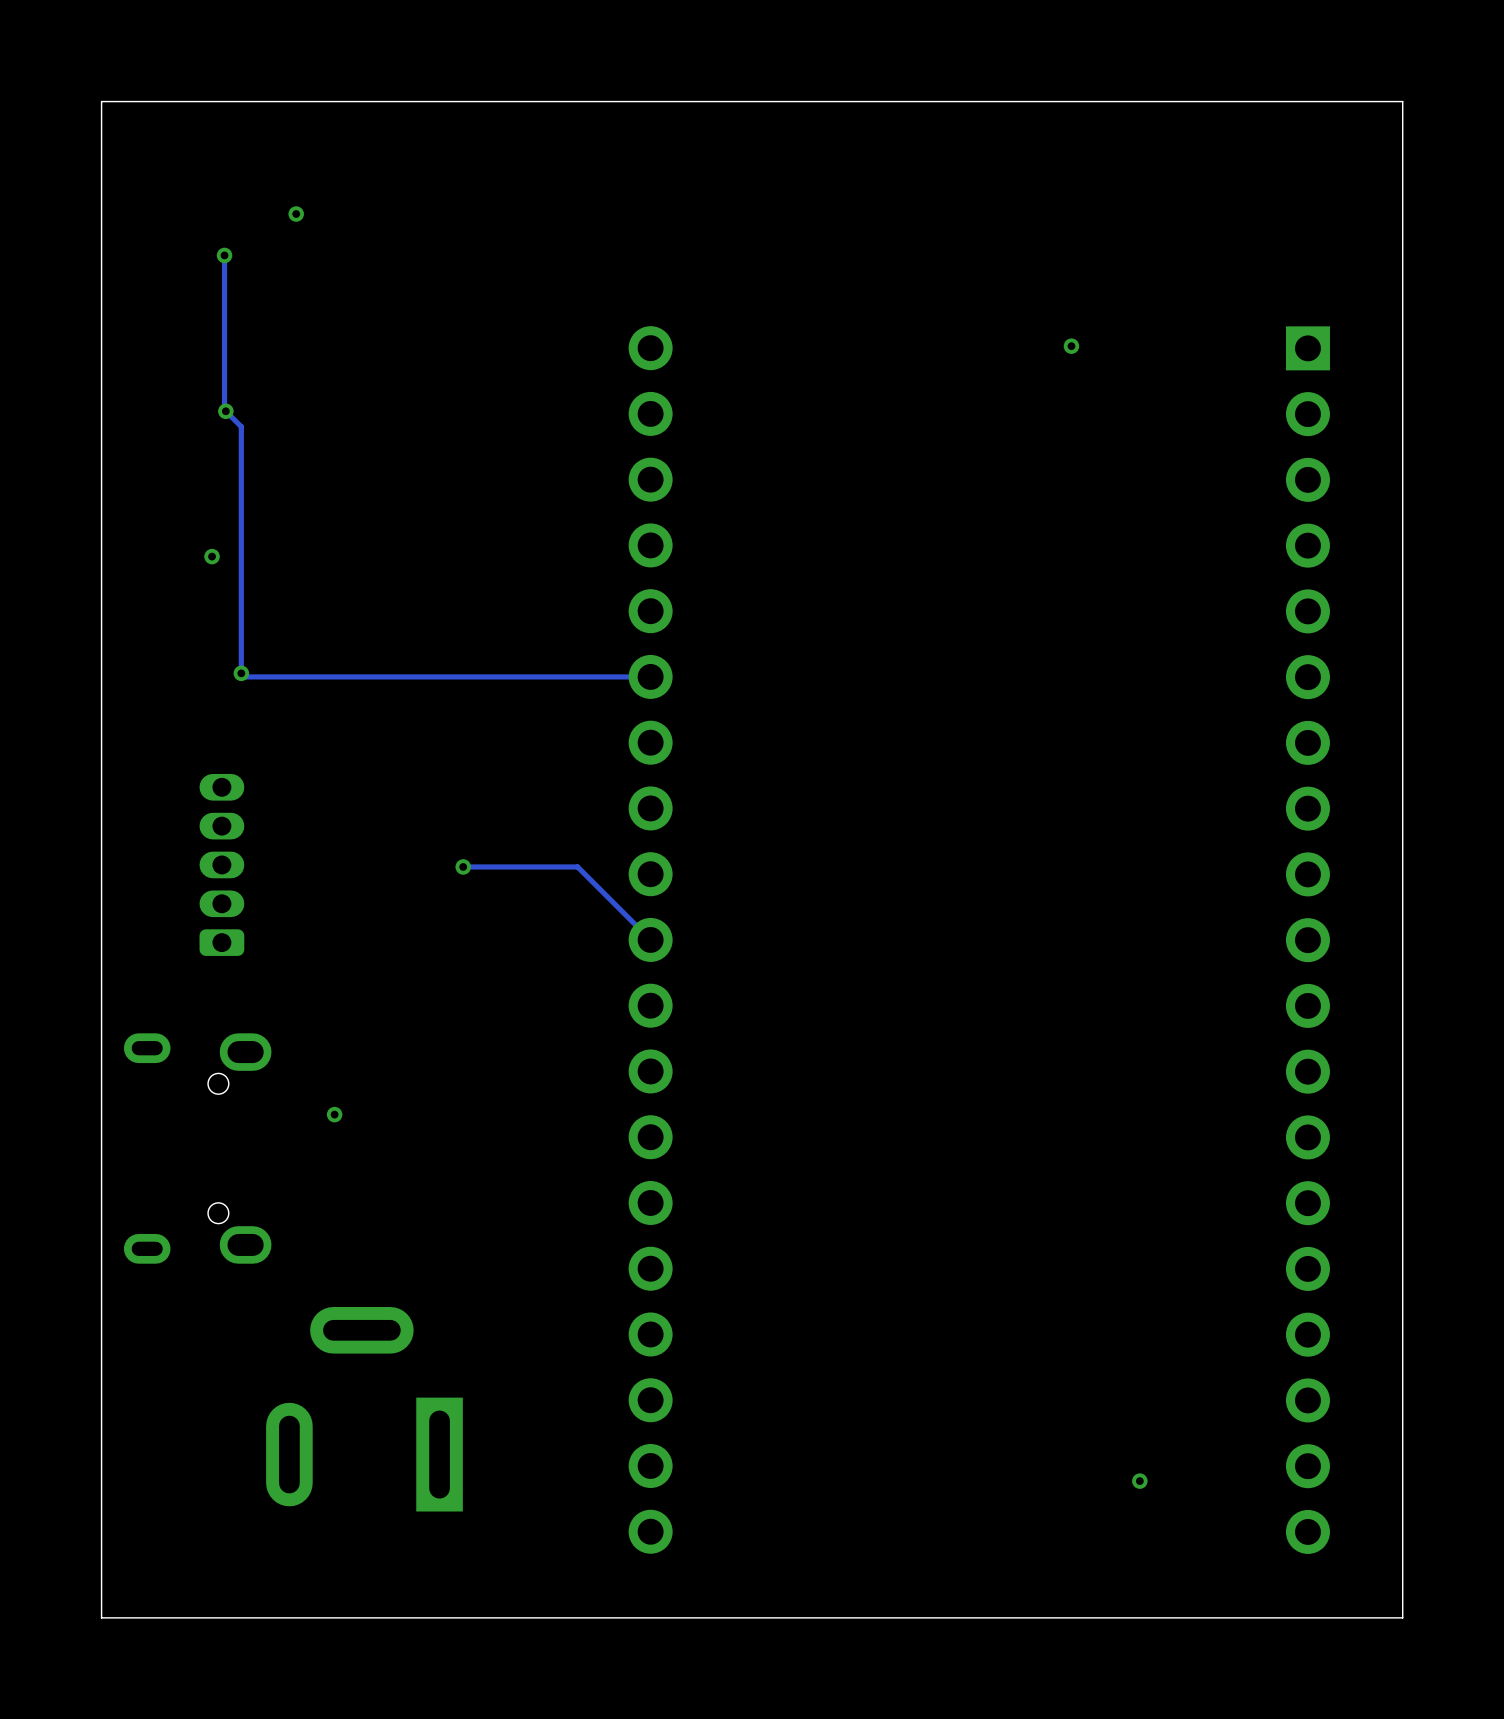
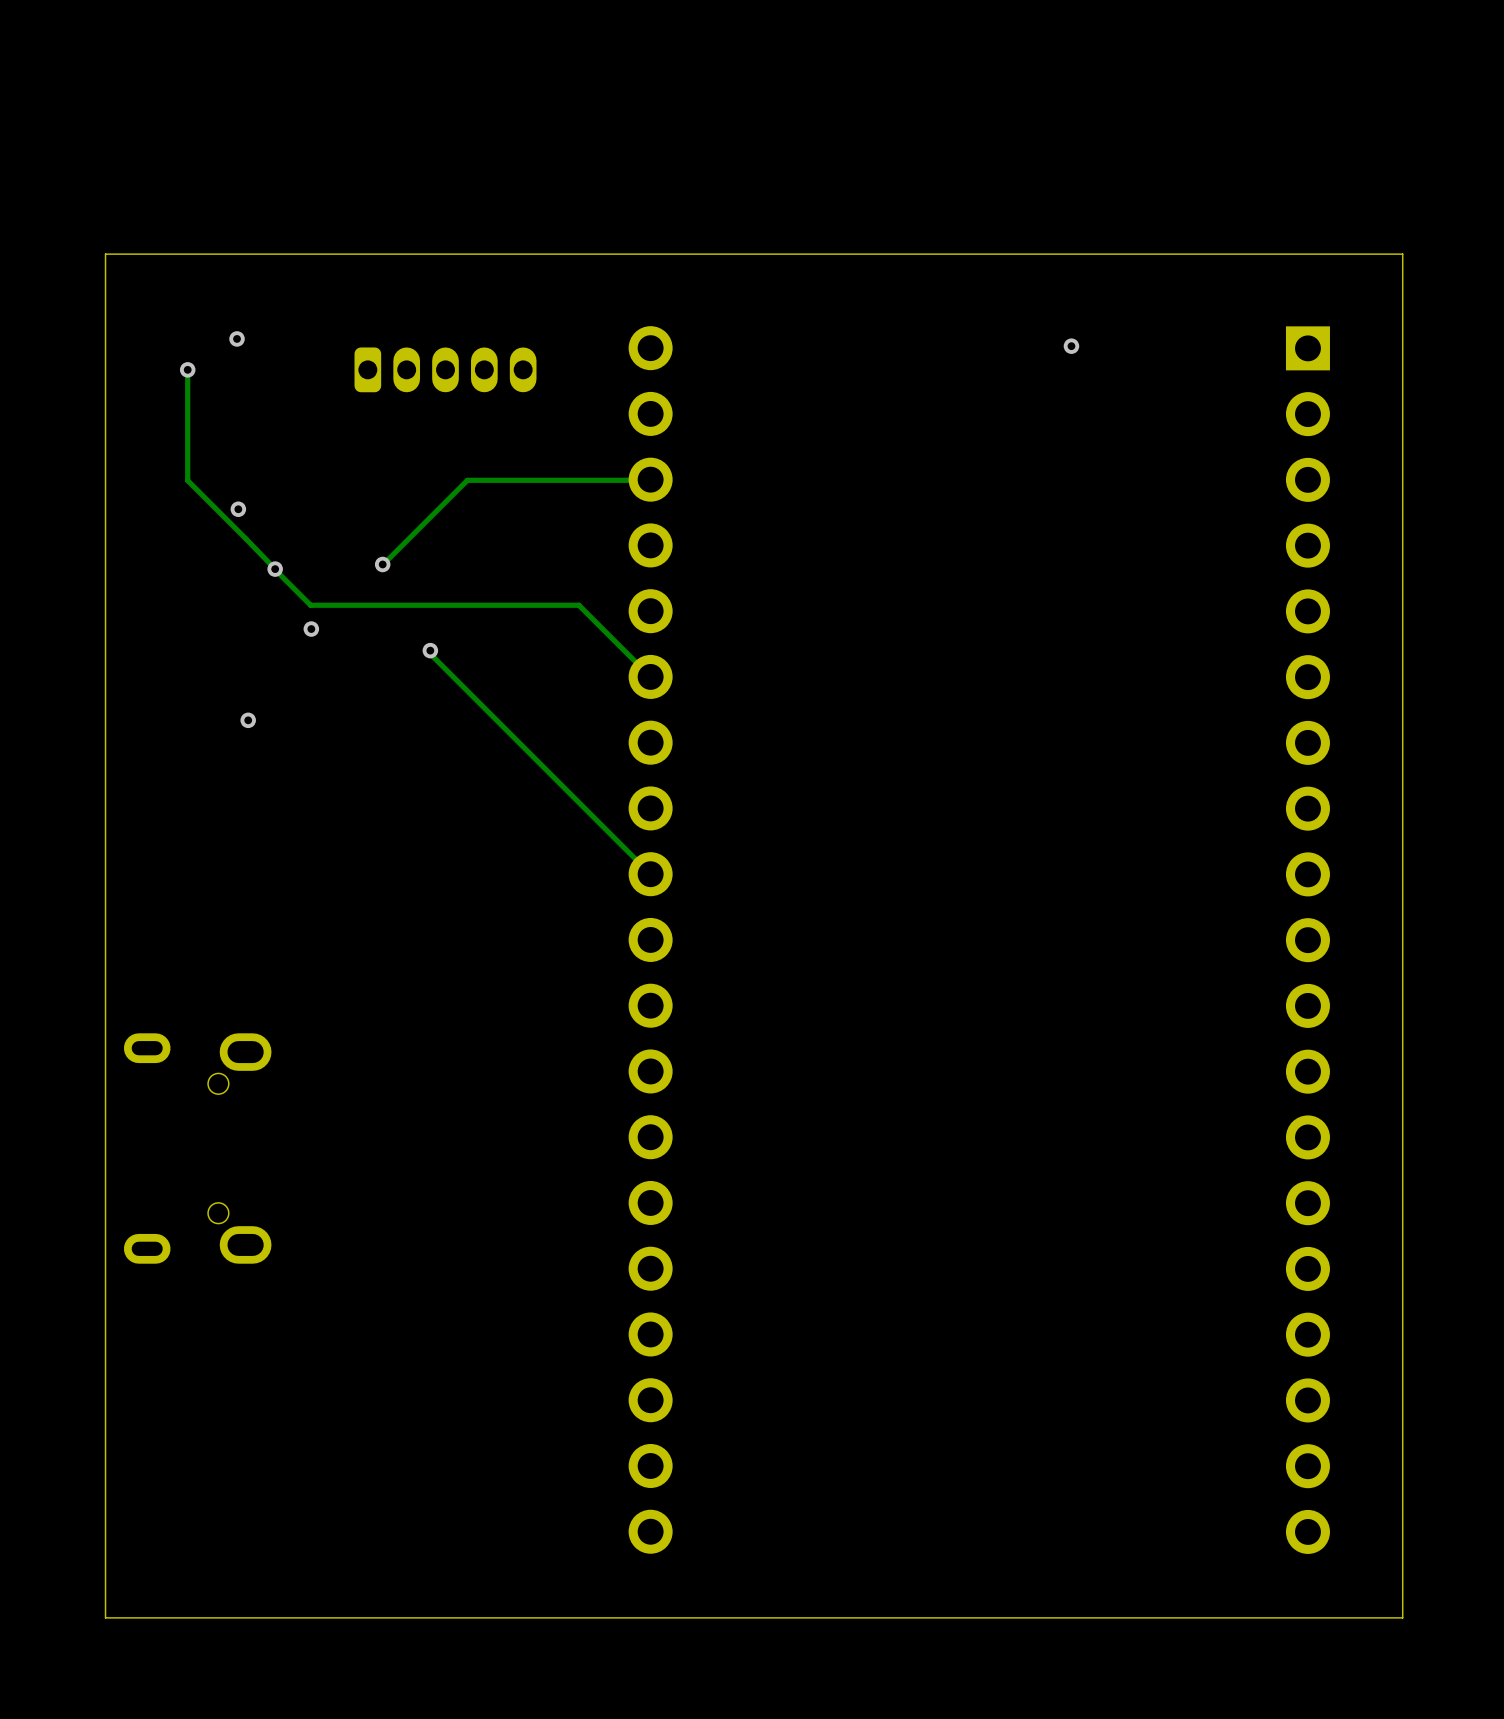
via: (296, 214) -> none
board edge: (1402, 254) (1402, 101) (101, 101) (101, 1617) (105, 1617) -> (1402, 254) (105, 254) (105, 1617)
track: (224, 255) (224, 409) (241, 426) (241, 673) (244, 676) (650, 676) -> (187, 369) (187, 480) (310, 605) (578, 605) (650, 676)
via: (224, 255) -> none
via: none -> (237, 338)
via: none -> (187, 369)
via: (225, 411) -> none
track: none -> (649, 480) (467, 480) (382, 564)
via: none -> (238, 509)
via: (212, 556) -> none
via: none -> (382, 564)
via: none -> (275, 569)
via: none -> (311, 629)
track: none -> (430, 650) (430, 653) (650, 874)
via: none -> (430, 650)
via: (241, 673) -> none
via: none -> (248, 720)
part rotation: 0° (221, 864) -> 90° clockwise (445, 369)
part position: (221, 864) -> (445, 369)
track: (463, 866) (577, 866) (650, 939) -> none
via: (463, 866) -> none
via: (334, 1114) -> none
part: (364, 1409) -> none
via: (1139, 1481) -> none

